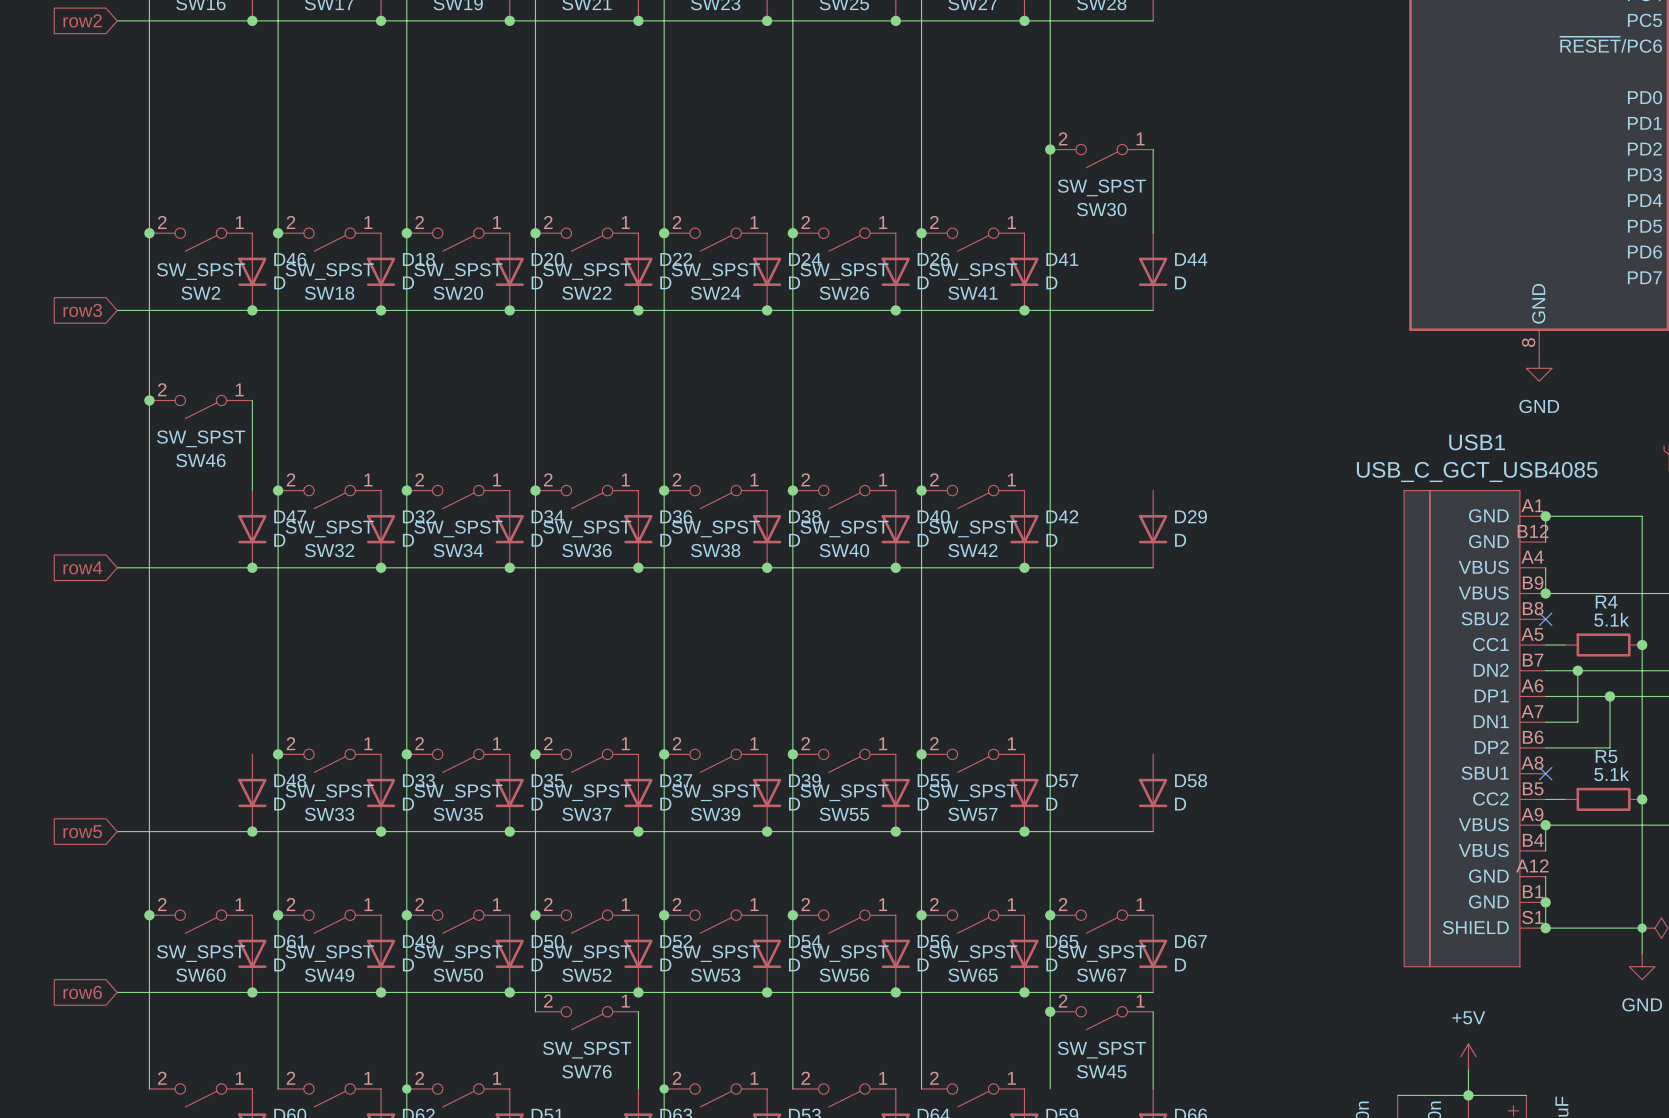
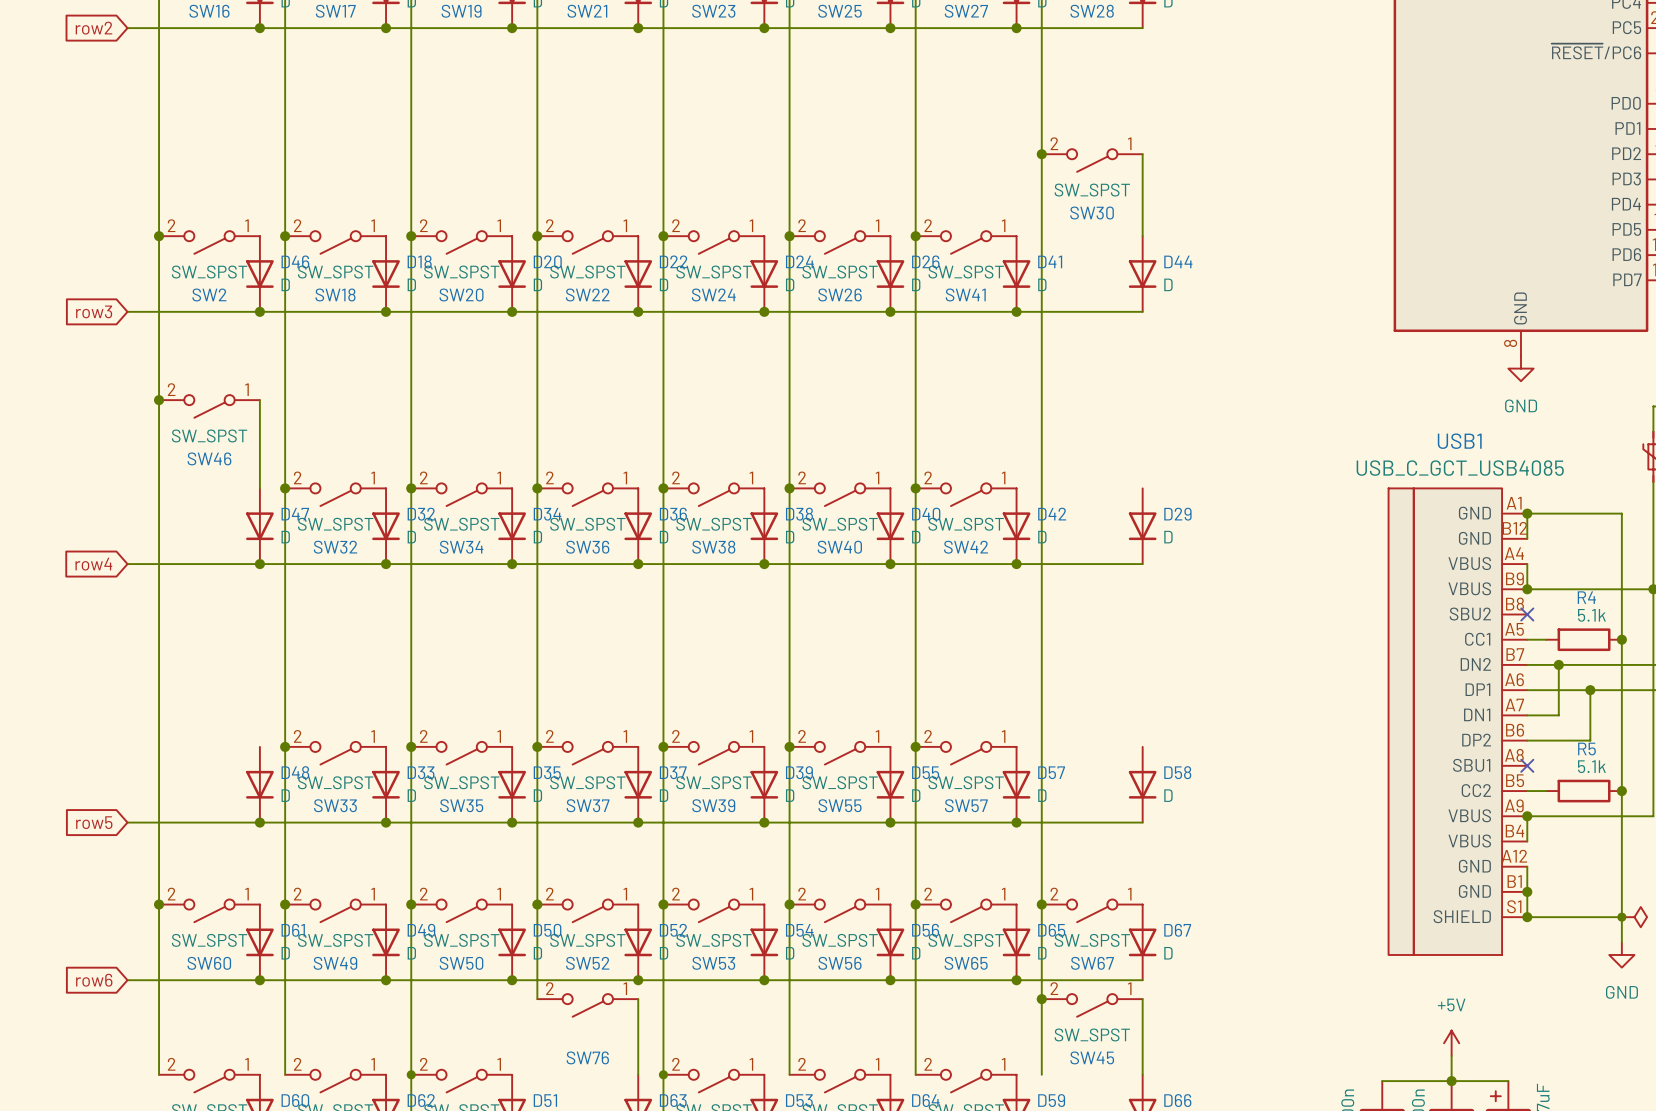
SW76 value: SW_SPST (587, 1050) -> none

